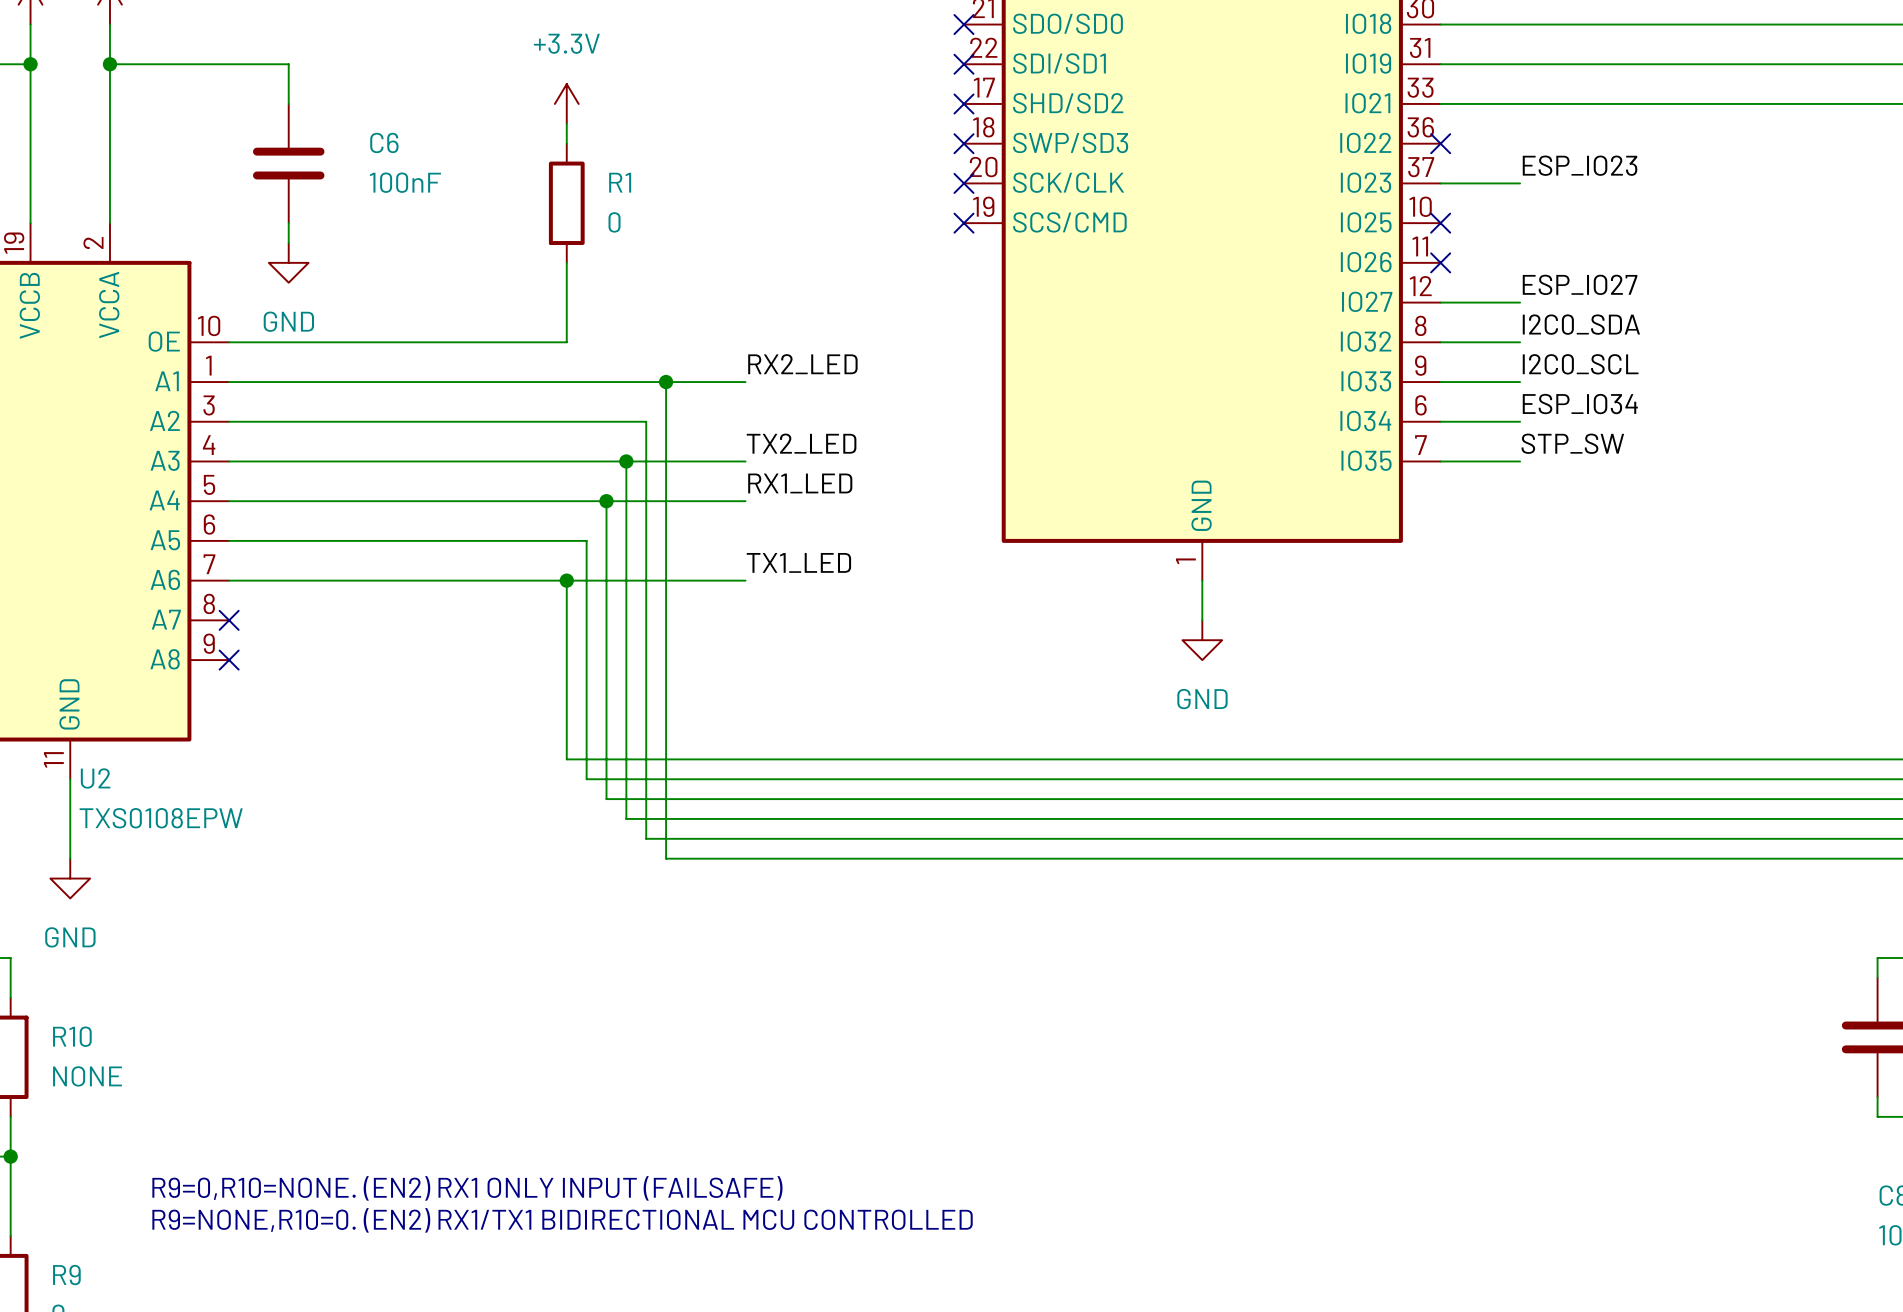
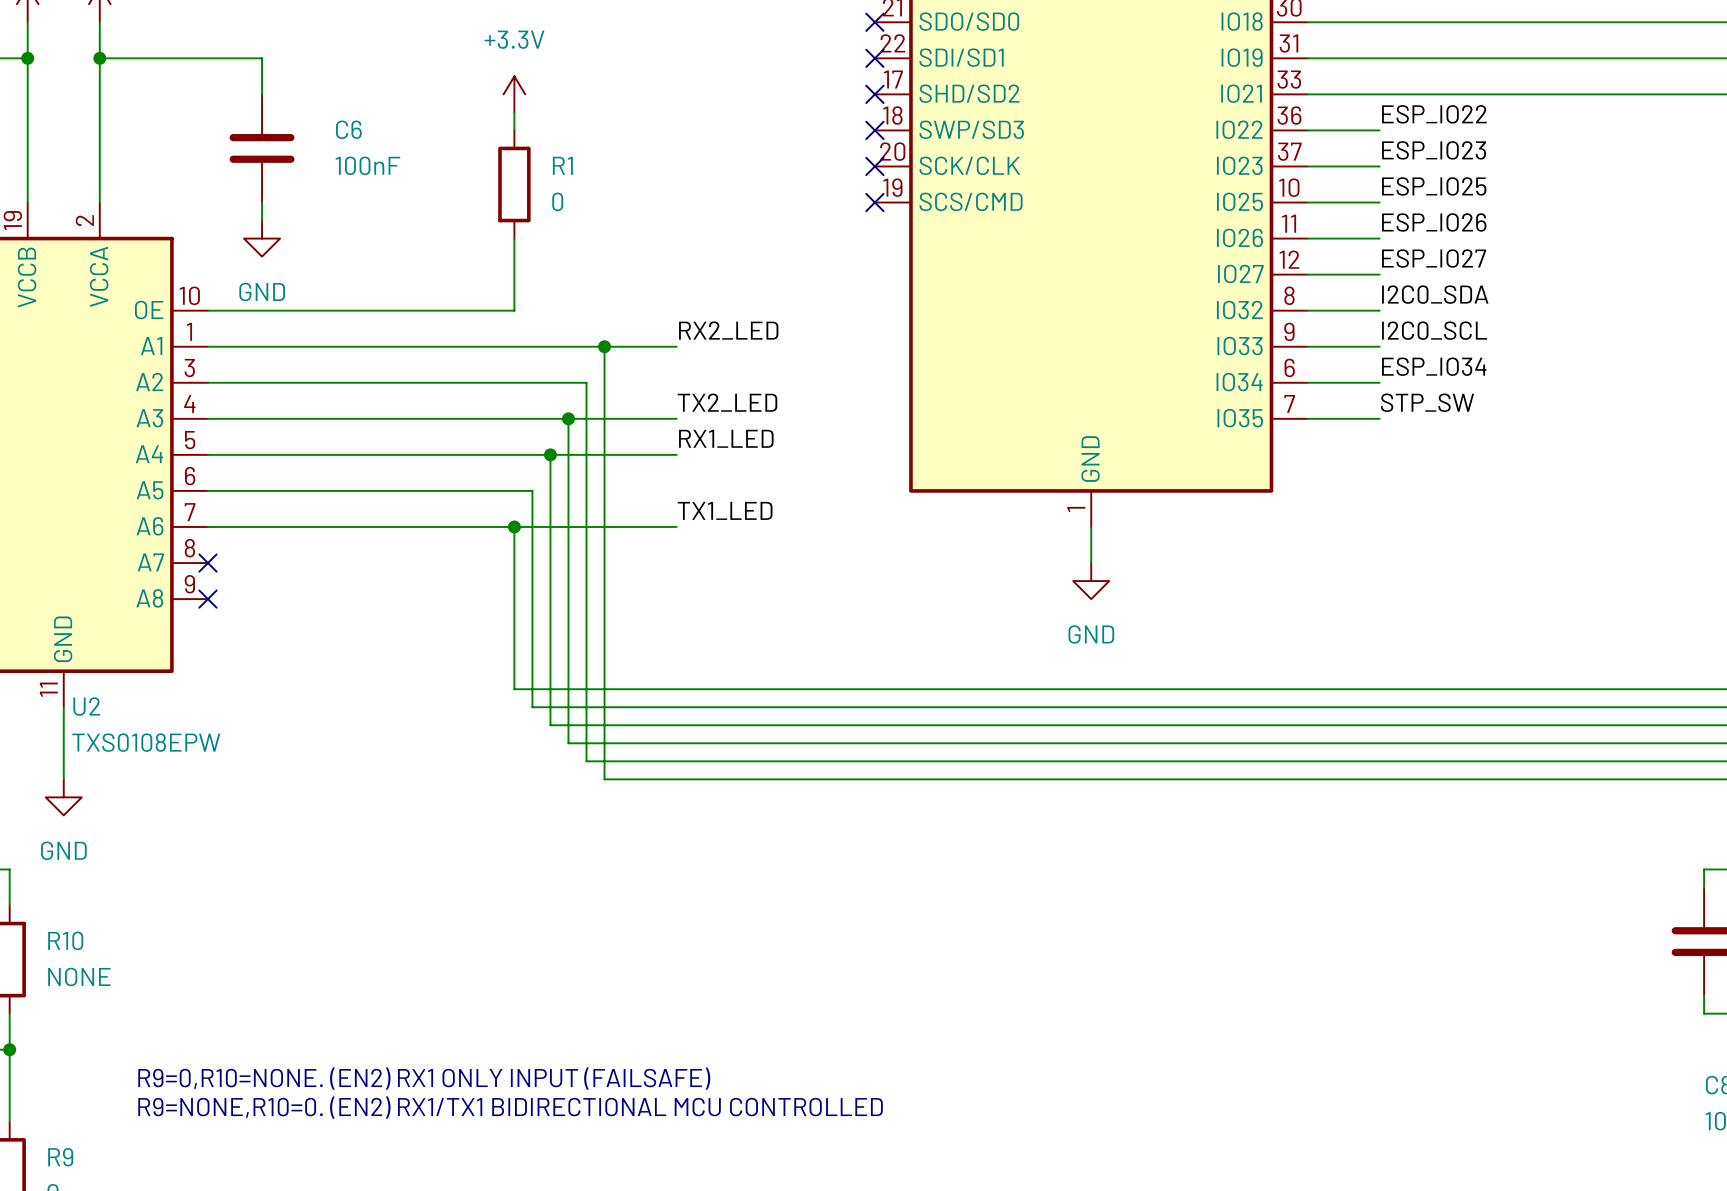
label: none -> ESP_IO22 (1434, 114)
wire: none -> (1307, 130) (1379, 130)
no-connect mark: (1440, 143) -> none
label: none -> ESP_IO25 (1434, 186)
wire: none -> (1307, 202) (1379, 202)
no-connect mark: (1440, 223) -> none
label: none -> ESP_IO26 (1434, 222)
wire: none -> (1307, 238) (1379, 238)
no-connect mark: (1440, 262) -> none

